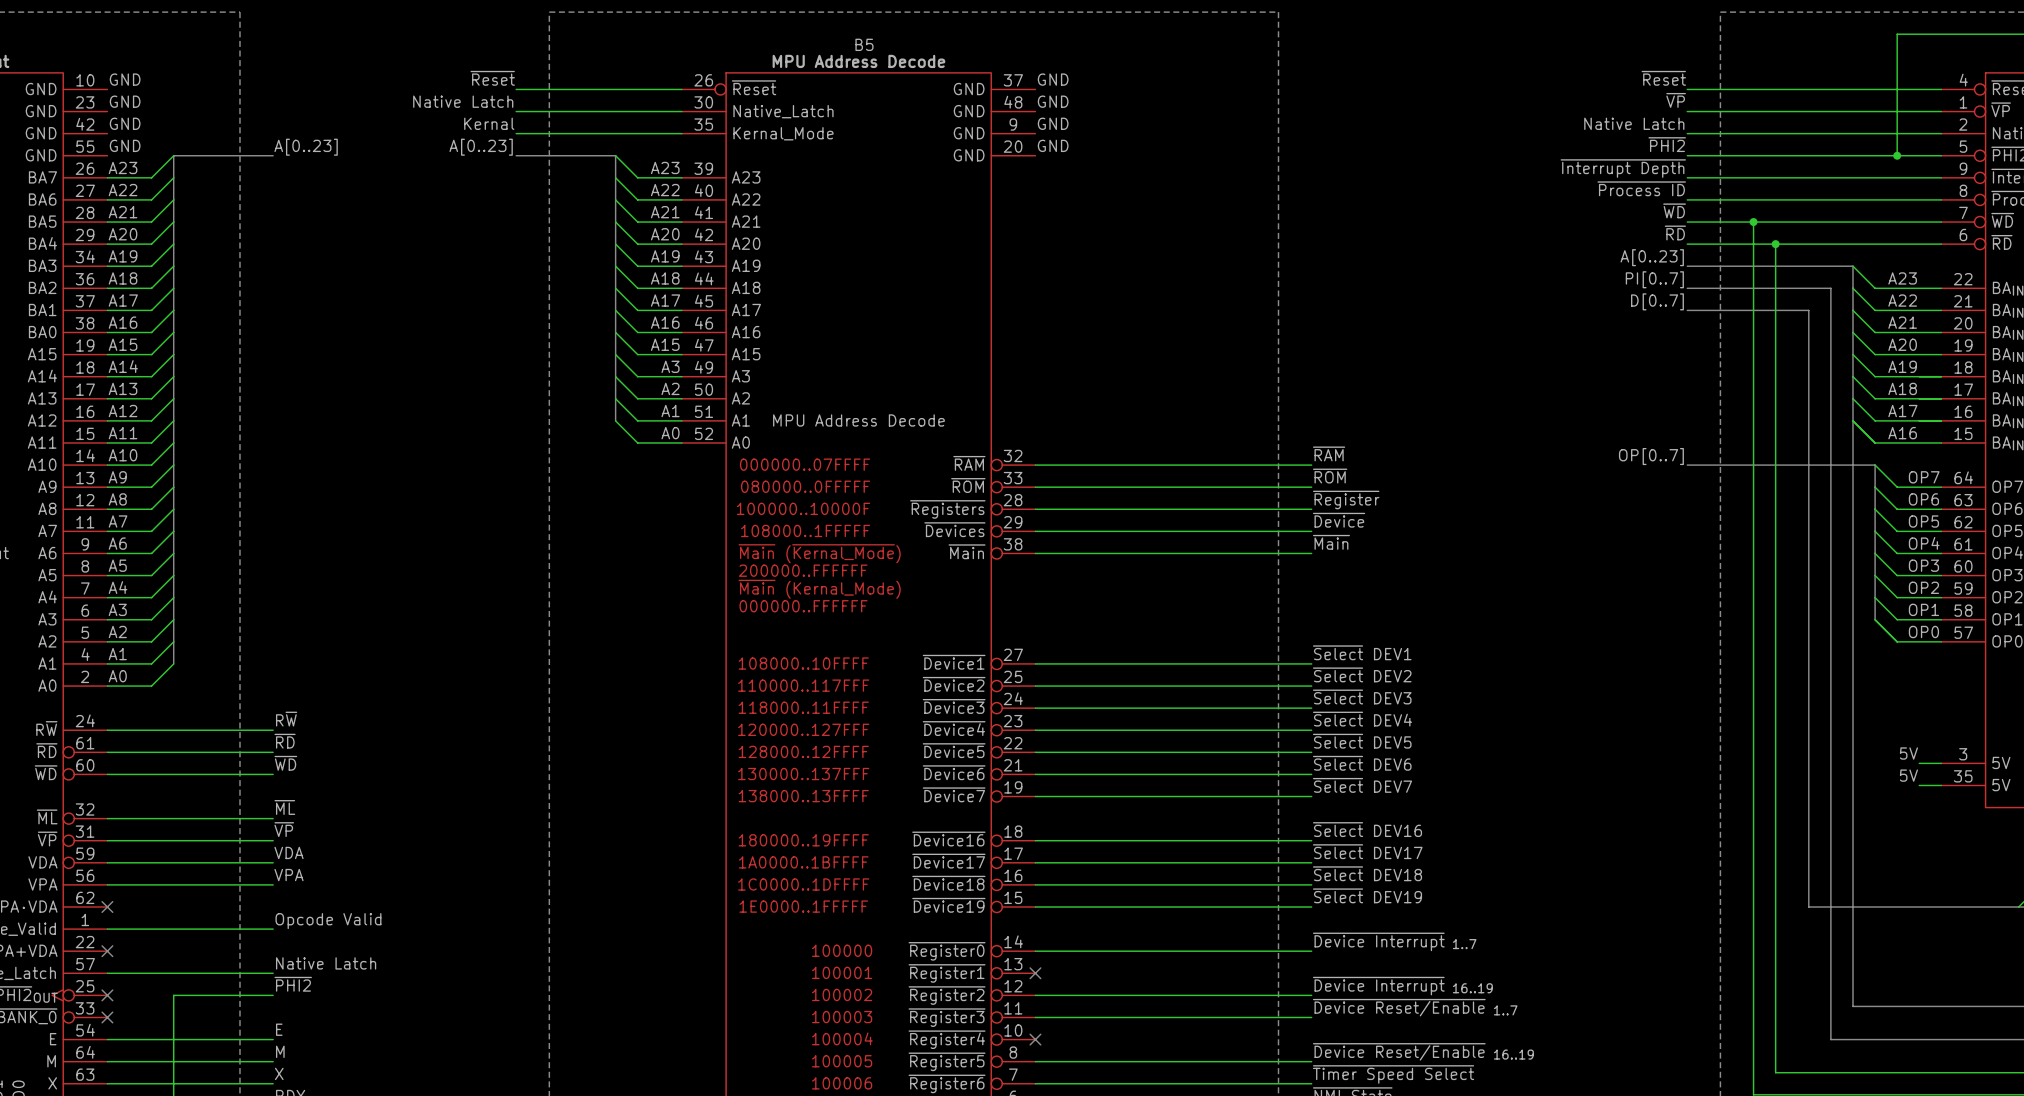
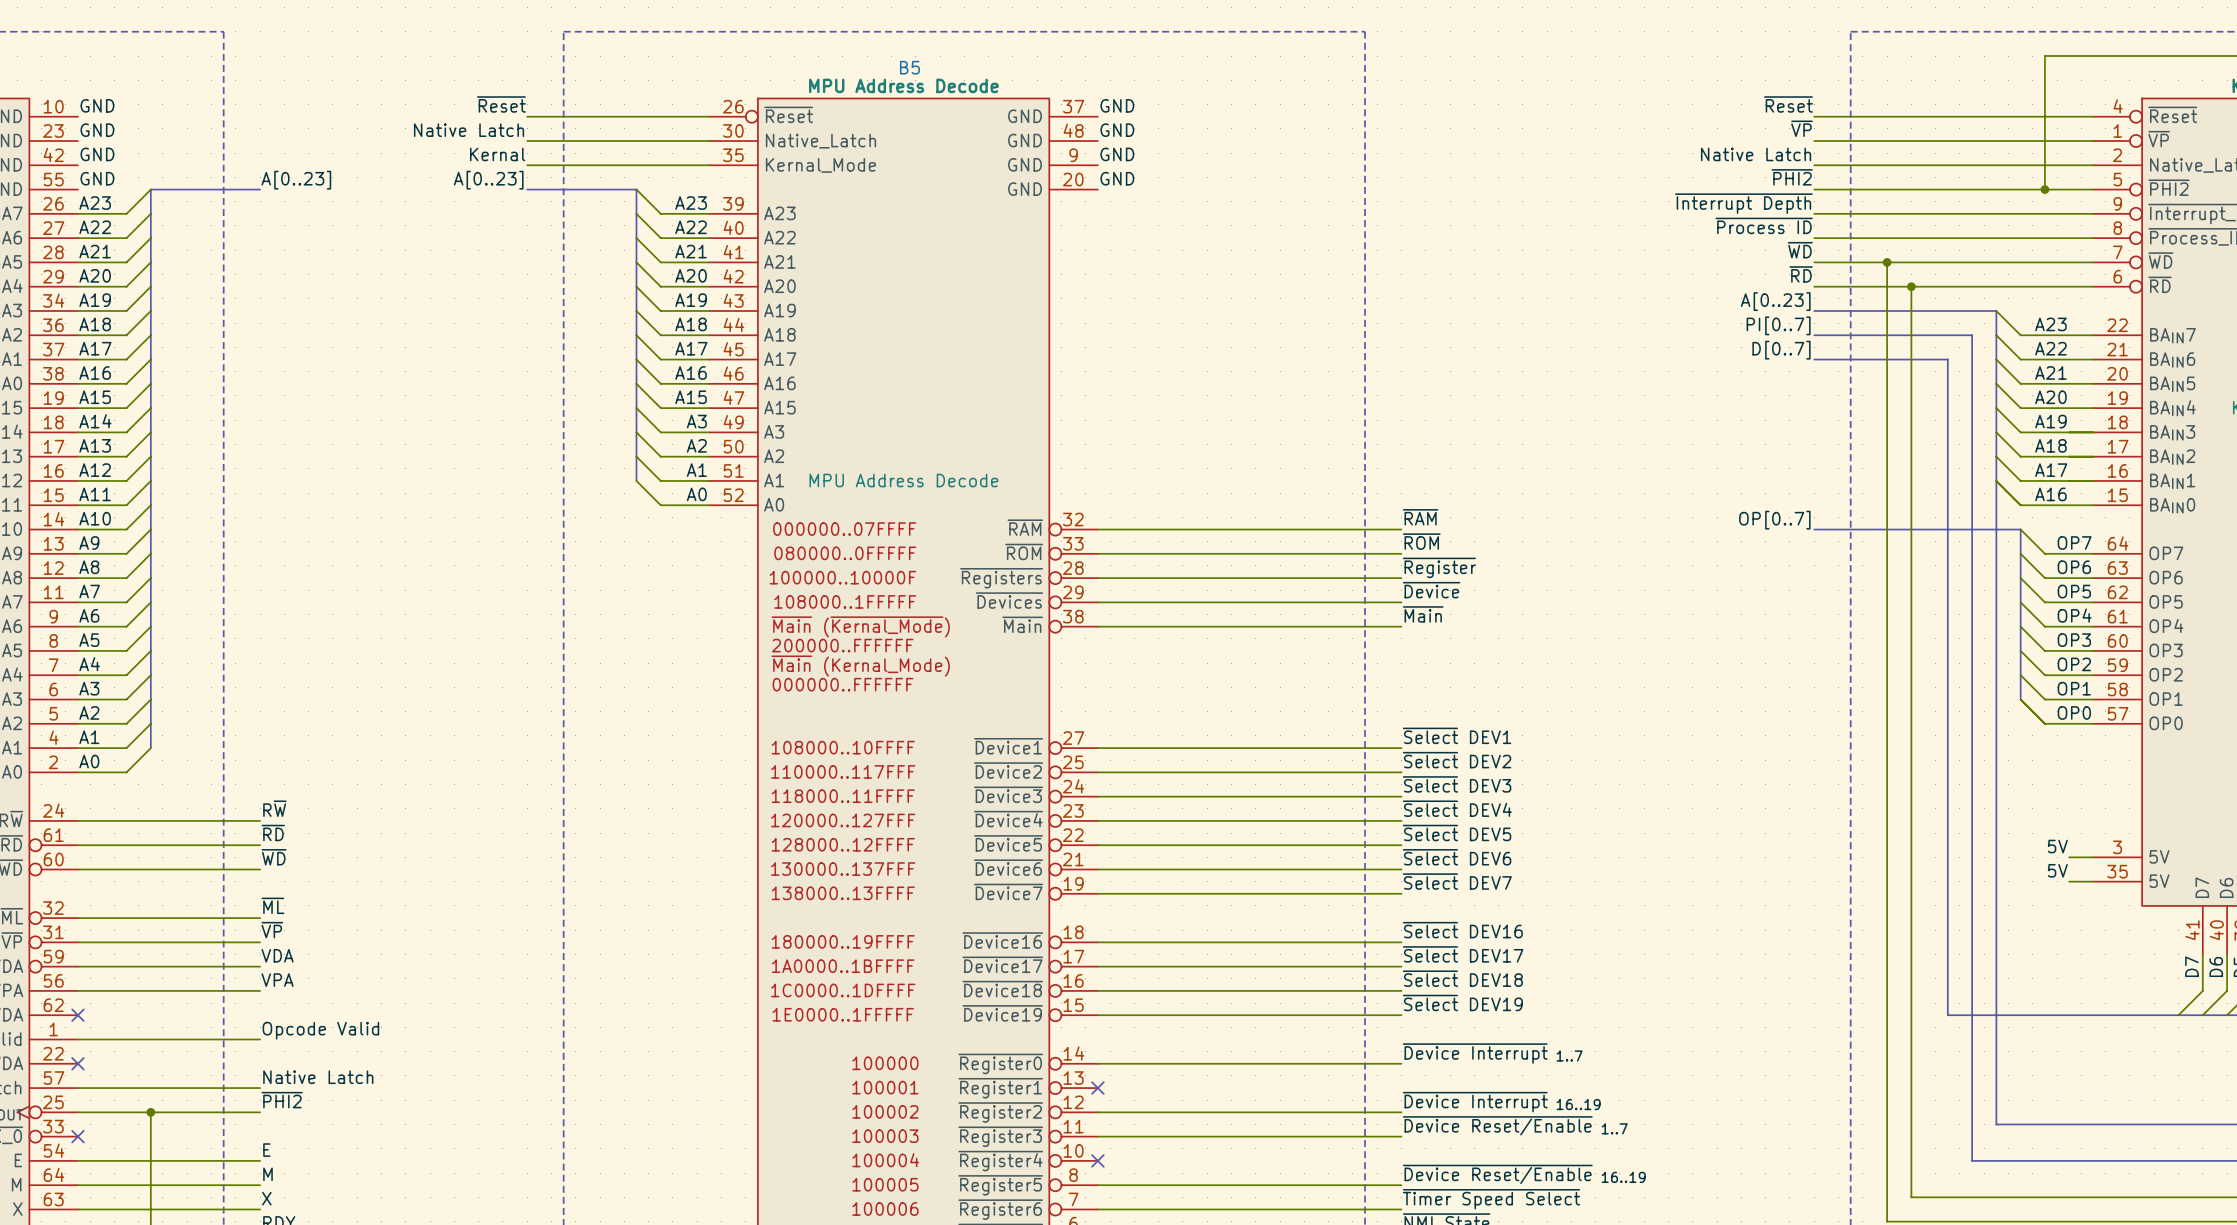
wire: none -> (77, 1112) (150, 1112)
no-connect mark: (107, 995) -> none
junction: none -> (150, 1112)

